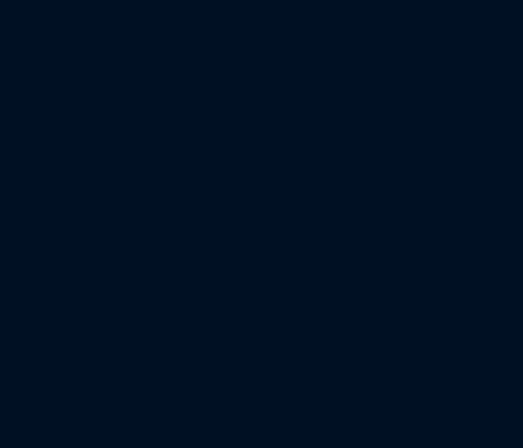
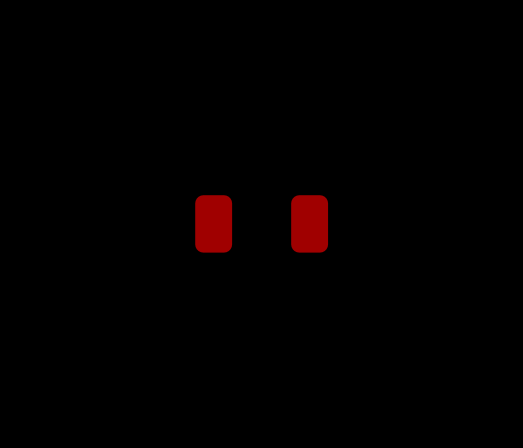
part: none -> (261, 223)

